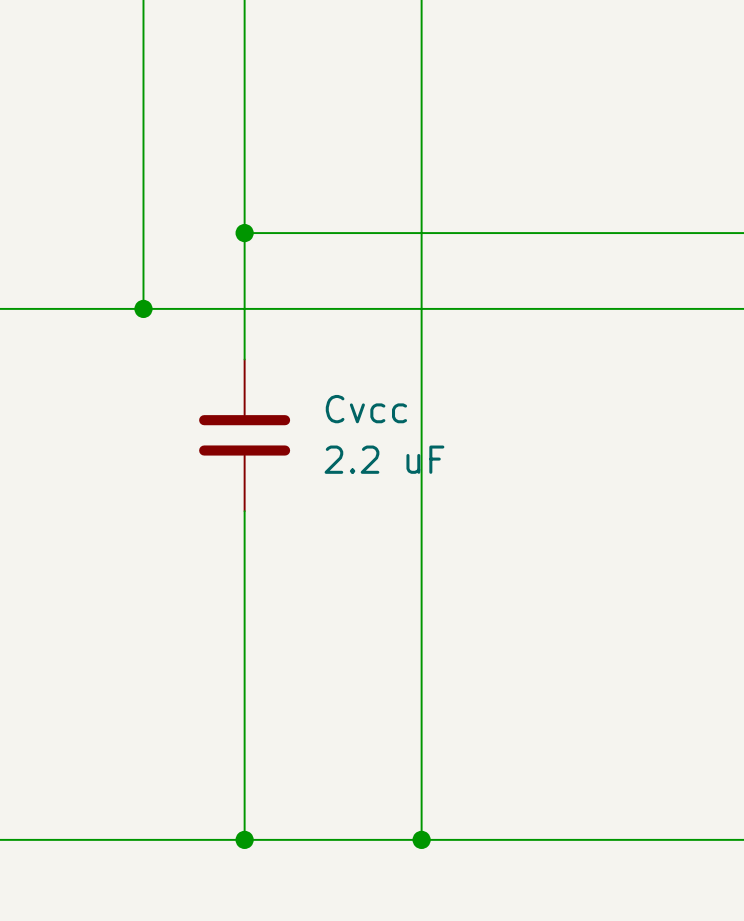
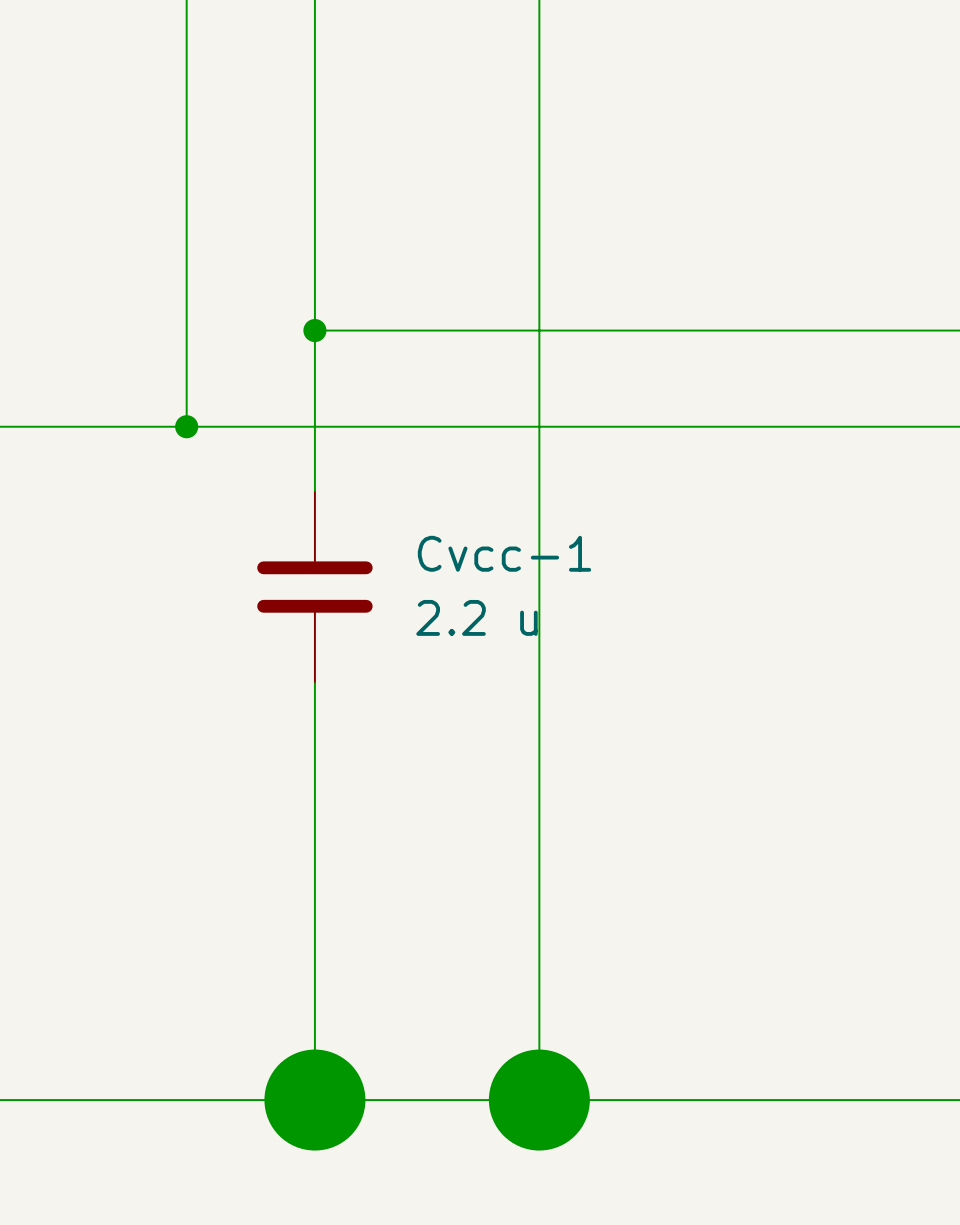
Cvcc name: Cvcc (366, 409) -> Cvcc-1 (504, 553)
Cvcc value: 2.2 uF (384, 459) -> 2.2 u (477, 617)
junction size: [235, 830, 254, 849] -> [264, 1049, 366, 1151]
junction size: [412, 830, 431, 849] -> [488, 1049, 590, 1151]

